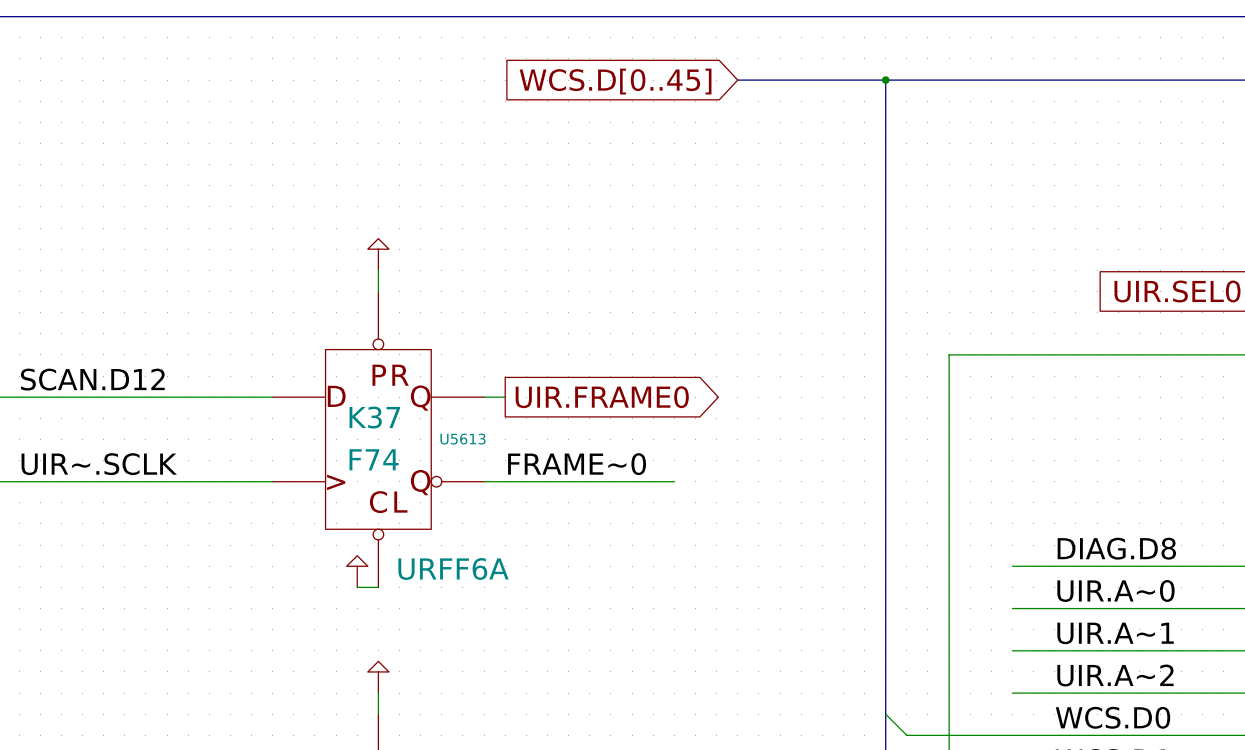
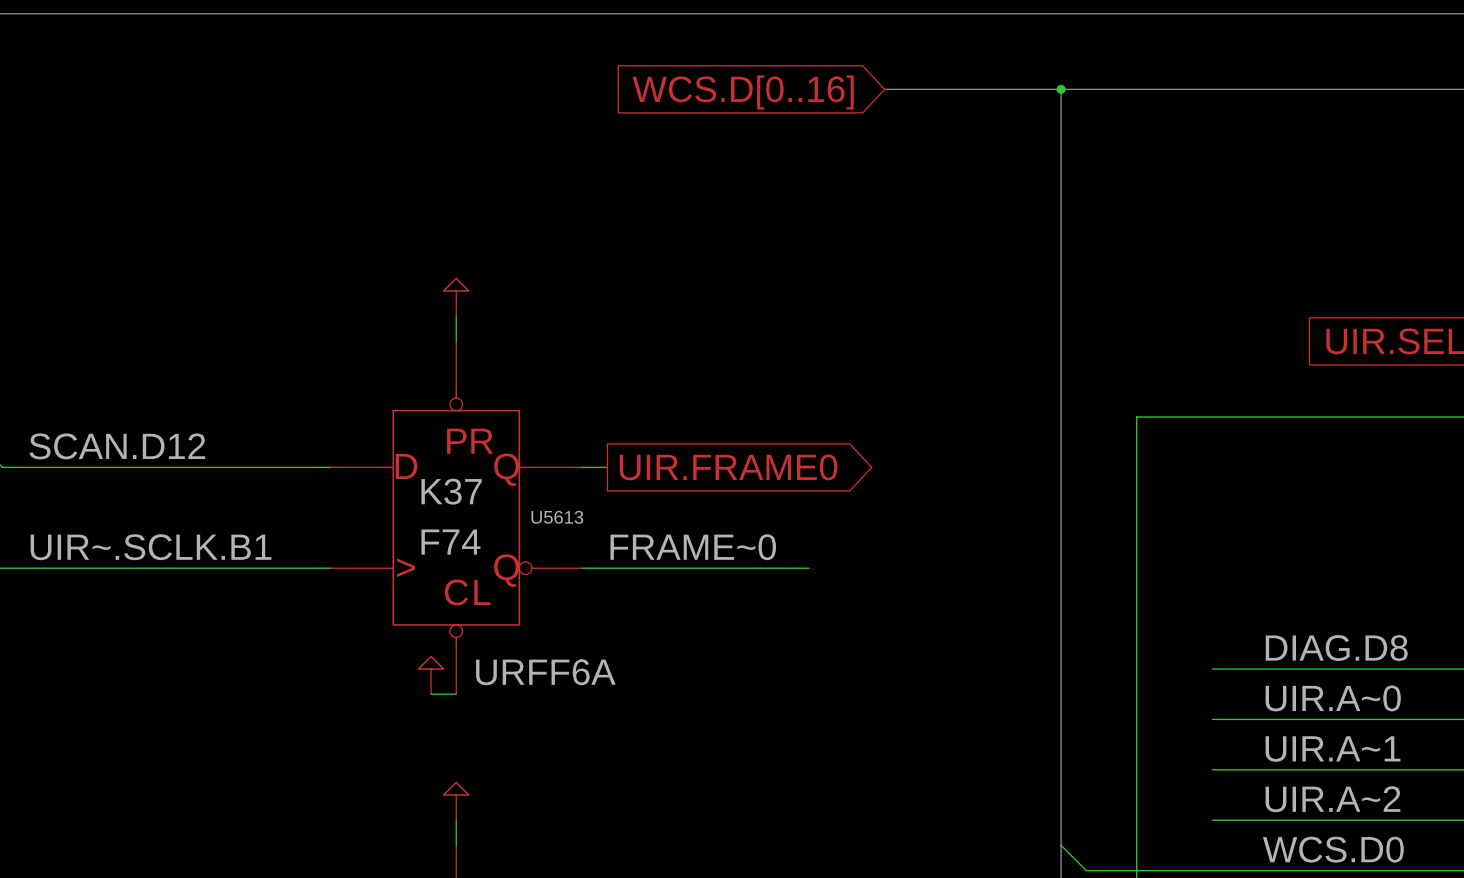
global label: WCS.D[0..45] (615, 81) -> WCS.D[0..16] (743, 92)
label: UIR~.SCLK (99, 464) -> UIR~.SCLK.B1 (151, 547)

